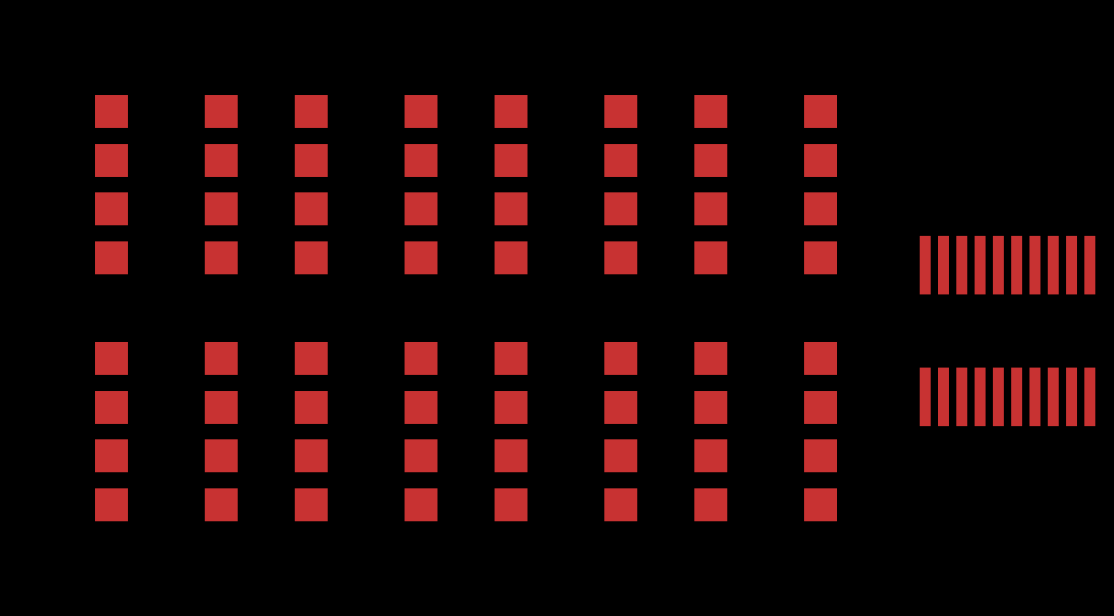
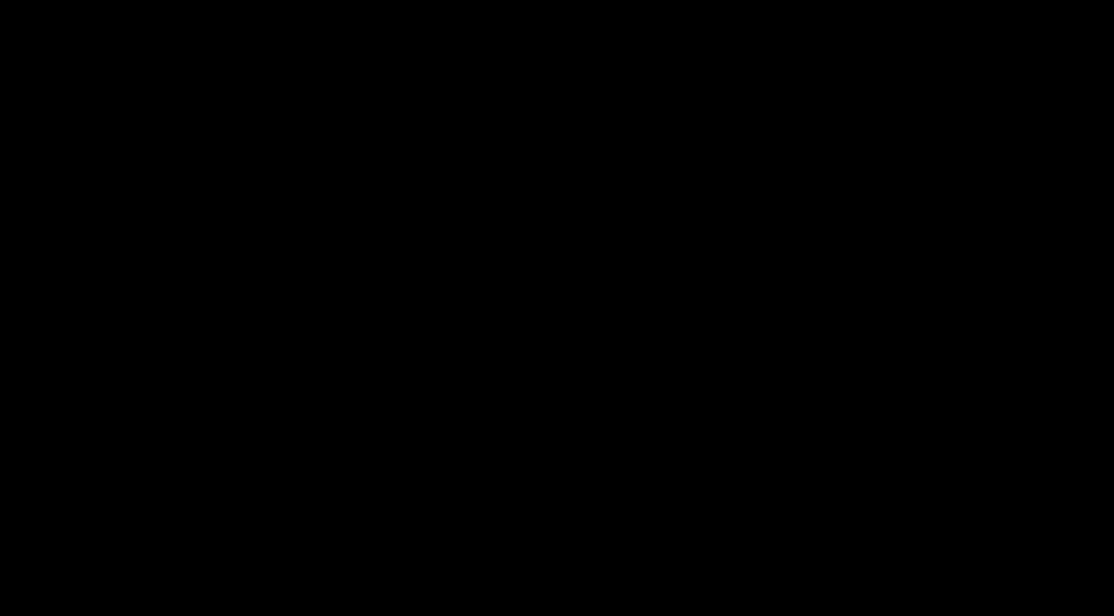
part: (166, 184) -> none
part: (366, 184) -> none
part: (565, 184) -> none
part: (765, 184) -> none
part: (1007, 331) -> none
part: (166, 431) -> none
part: (366, 431) -> none
part: (565, 431) -> none
part: (765, 431) -> none

